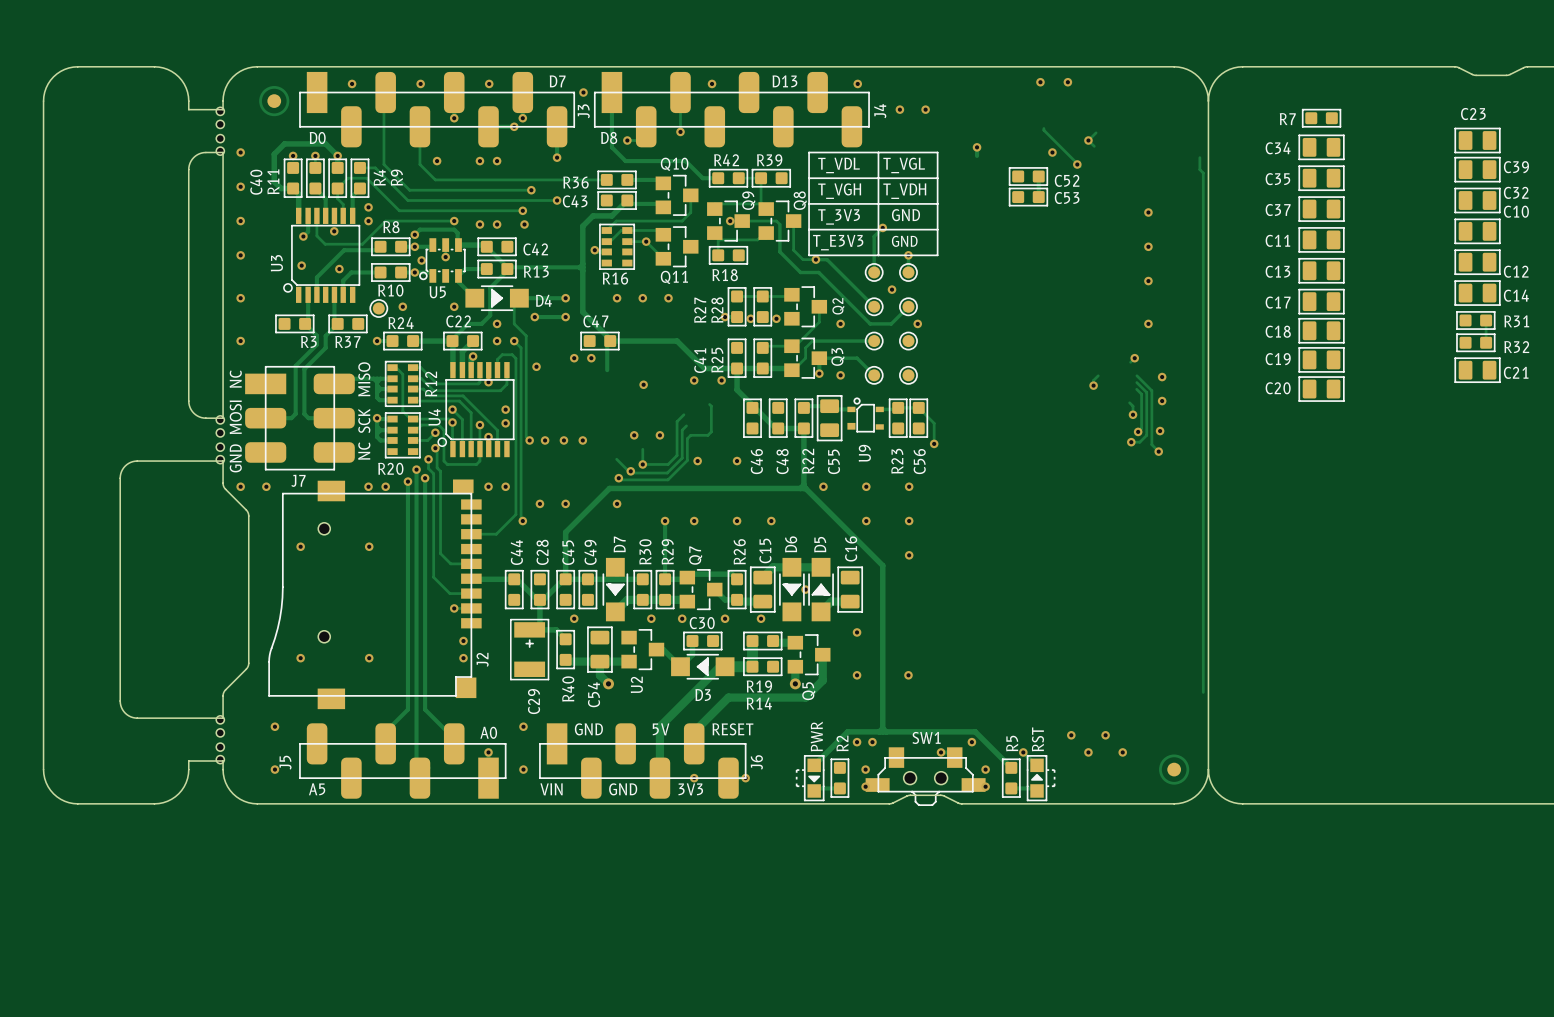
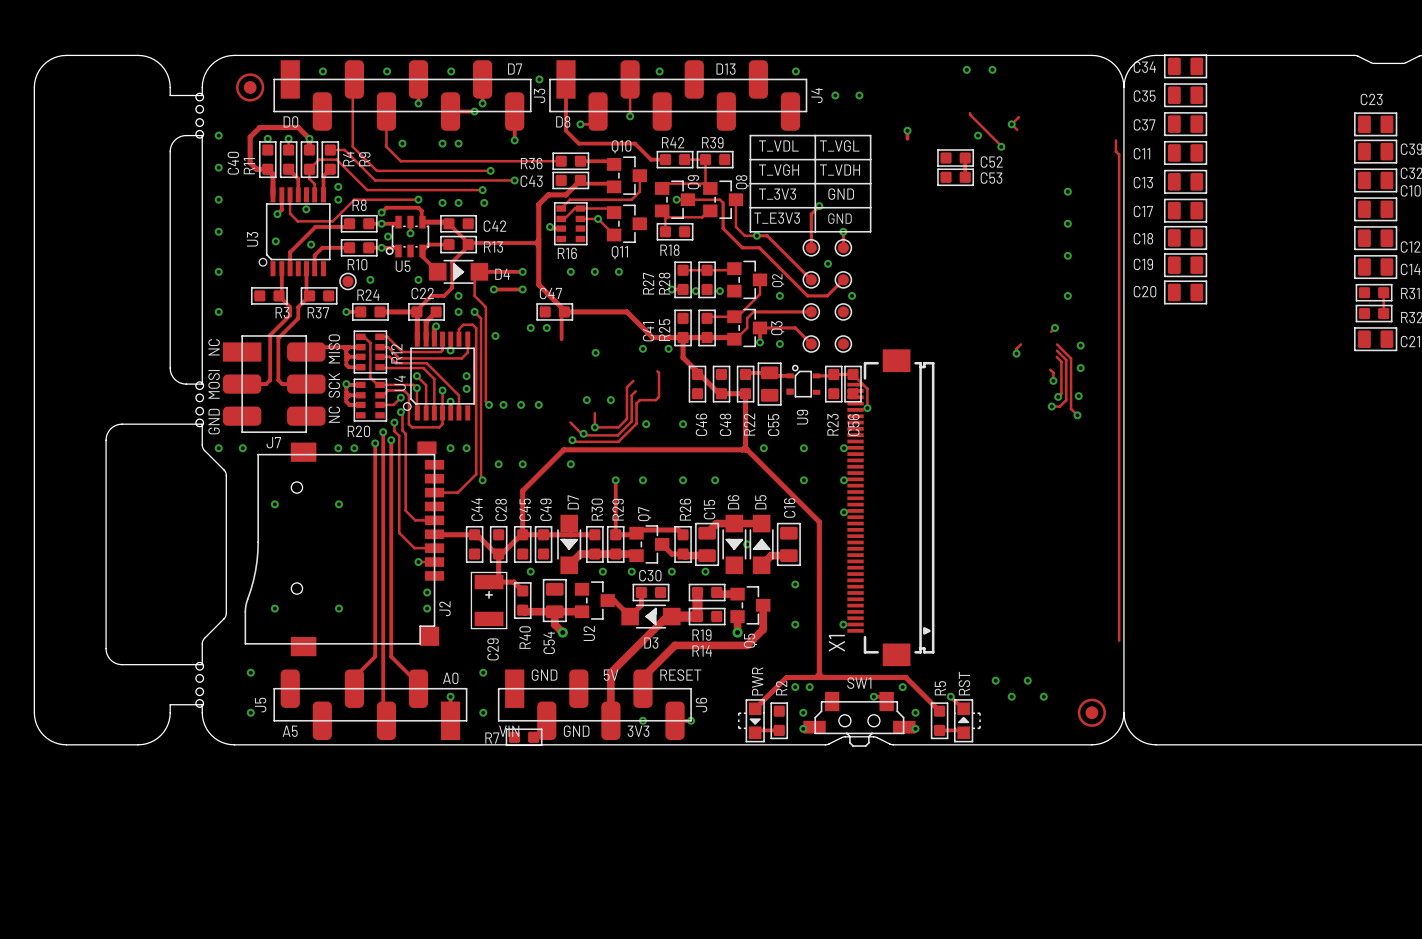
R7 position: (1321, 118) -> (524, 737)
C34 position: (1321, 147) -> (1185, 66)
C35 position: (1321, 178) -> (1185, 95)
C37 position: (1321, 209) -> (1185, 124)
C11 position: (1321, 239) -> (1185, 152)
C13 position: (1321, 270) -> (1185, 181)
C17 position: (1321, 301) -> (1185, 210)
C18 position: (1321, 330) -> (1185, 237)
C19 position: (1321, 359) -> (1185, 265)
C20 position: (1321, 389) -> (1185, 292)
X1: none -> (890, 507)

